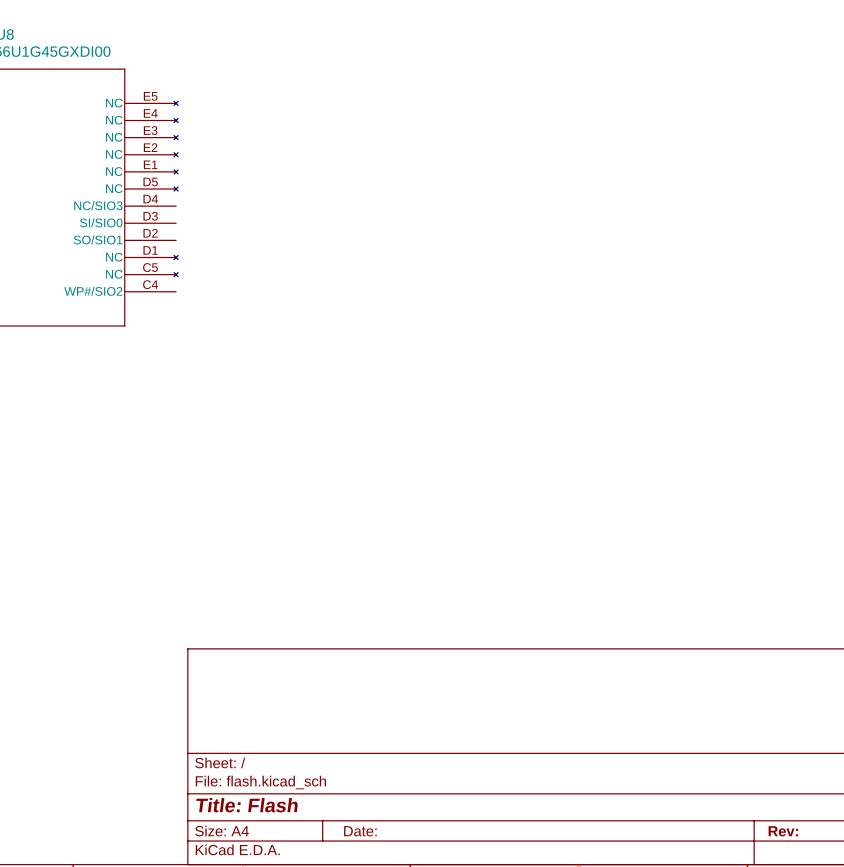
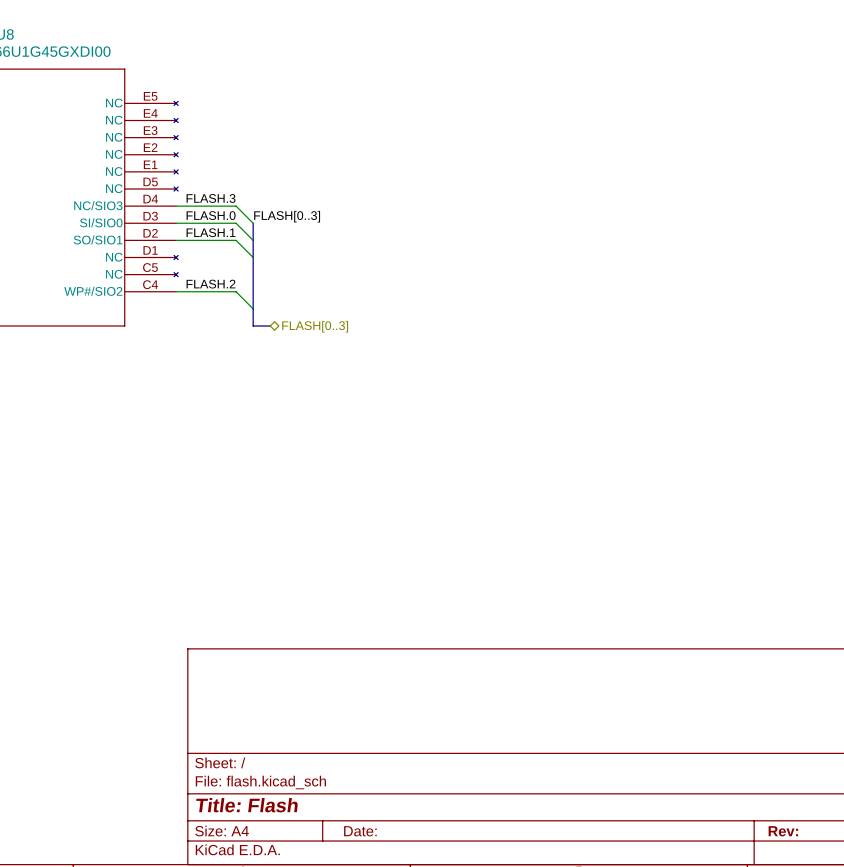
label: none -> FLASH.3 (211, 198)
wire: none -> (176, 206) (236, 206) (253, 223)
label: none -> FLASH.0 (211, 215)
label: none -> FLASH[0..3] (287, 216)
wire: none -> (176, 223) (236, 223) (253, 240)
bus: none -> (253, 223) (253, 325) (270, 325)
label: none -> FLASH.1 (211, 232)
wire: none -> (176, 240) (236, 240) (253, 257)
label: none -> FLASH.2 (210, 284)
wire: none -> (176, 291) (236, 291) (253, 308)
hierarchical label: none -> FLASH[0..3] (315, 326)

